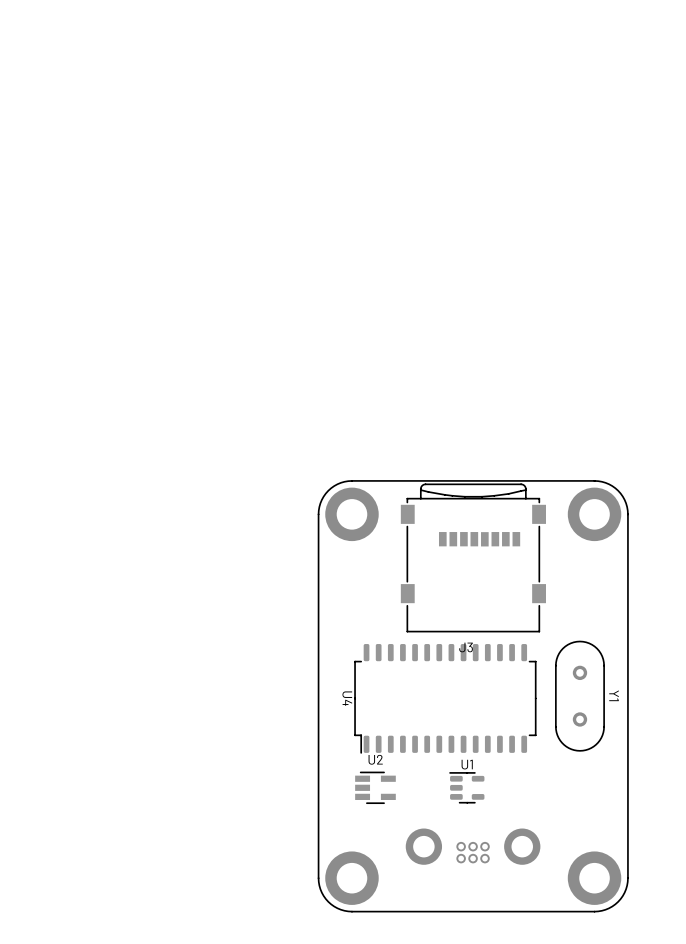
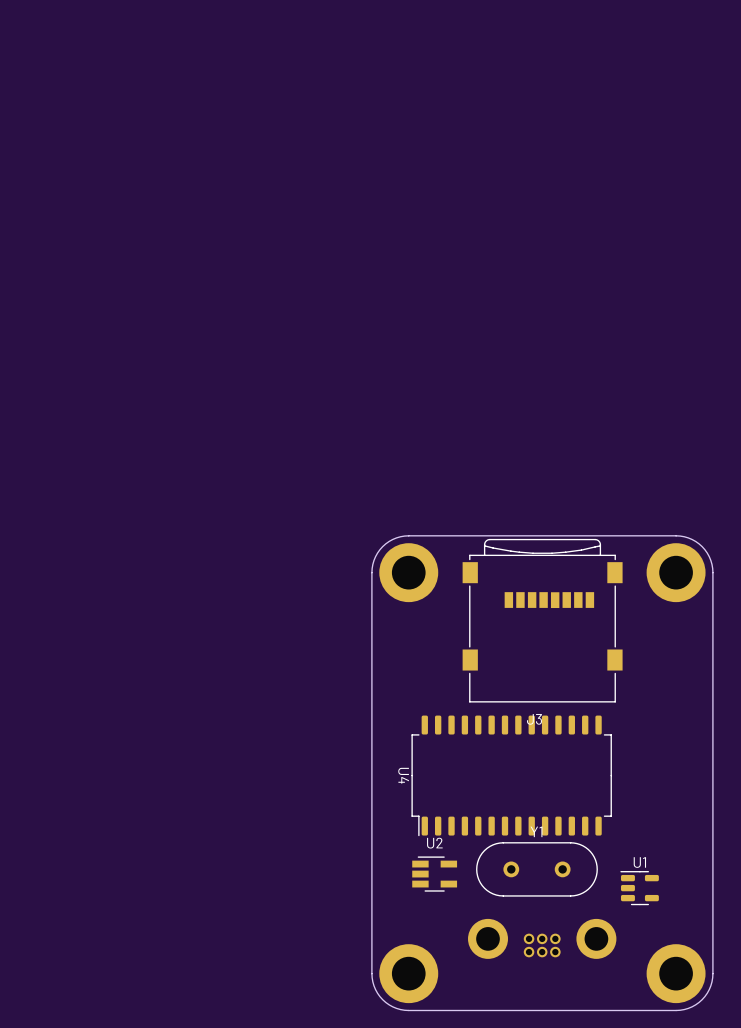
Y1 rotation: 0° (579, 696) -> 90° counterclockwise (536, 869)
Y1 position: (579, 696) -> (536, 869)
U1 position: (466, 787) -> (639, 888)

